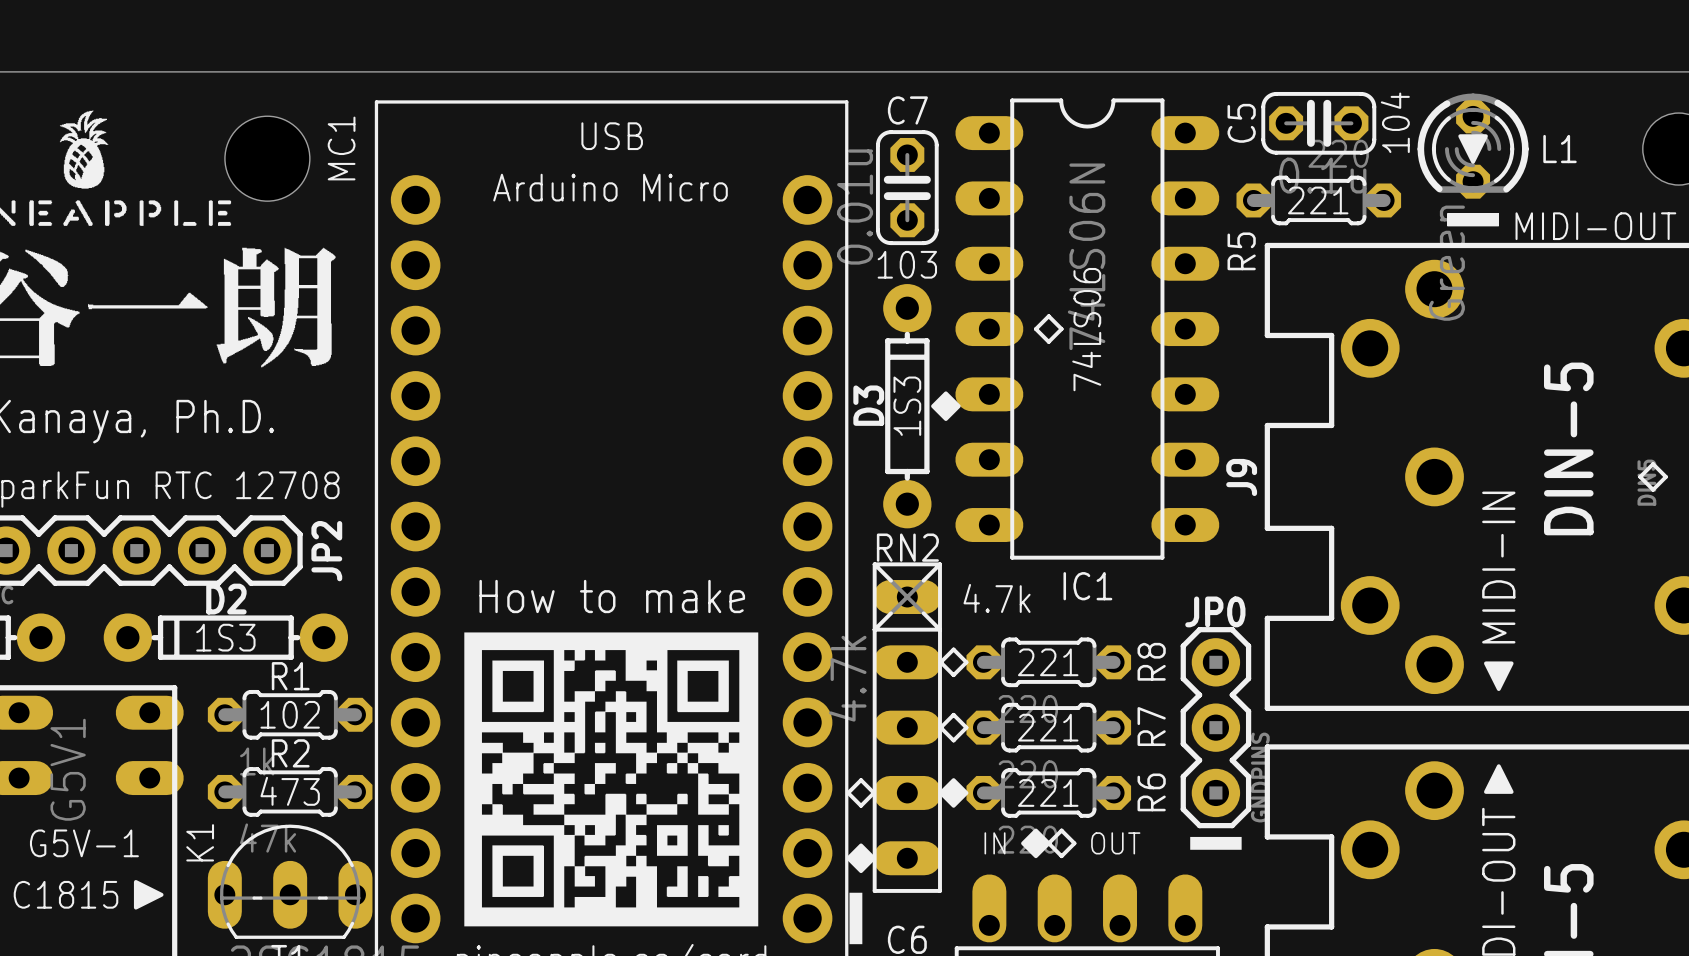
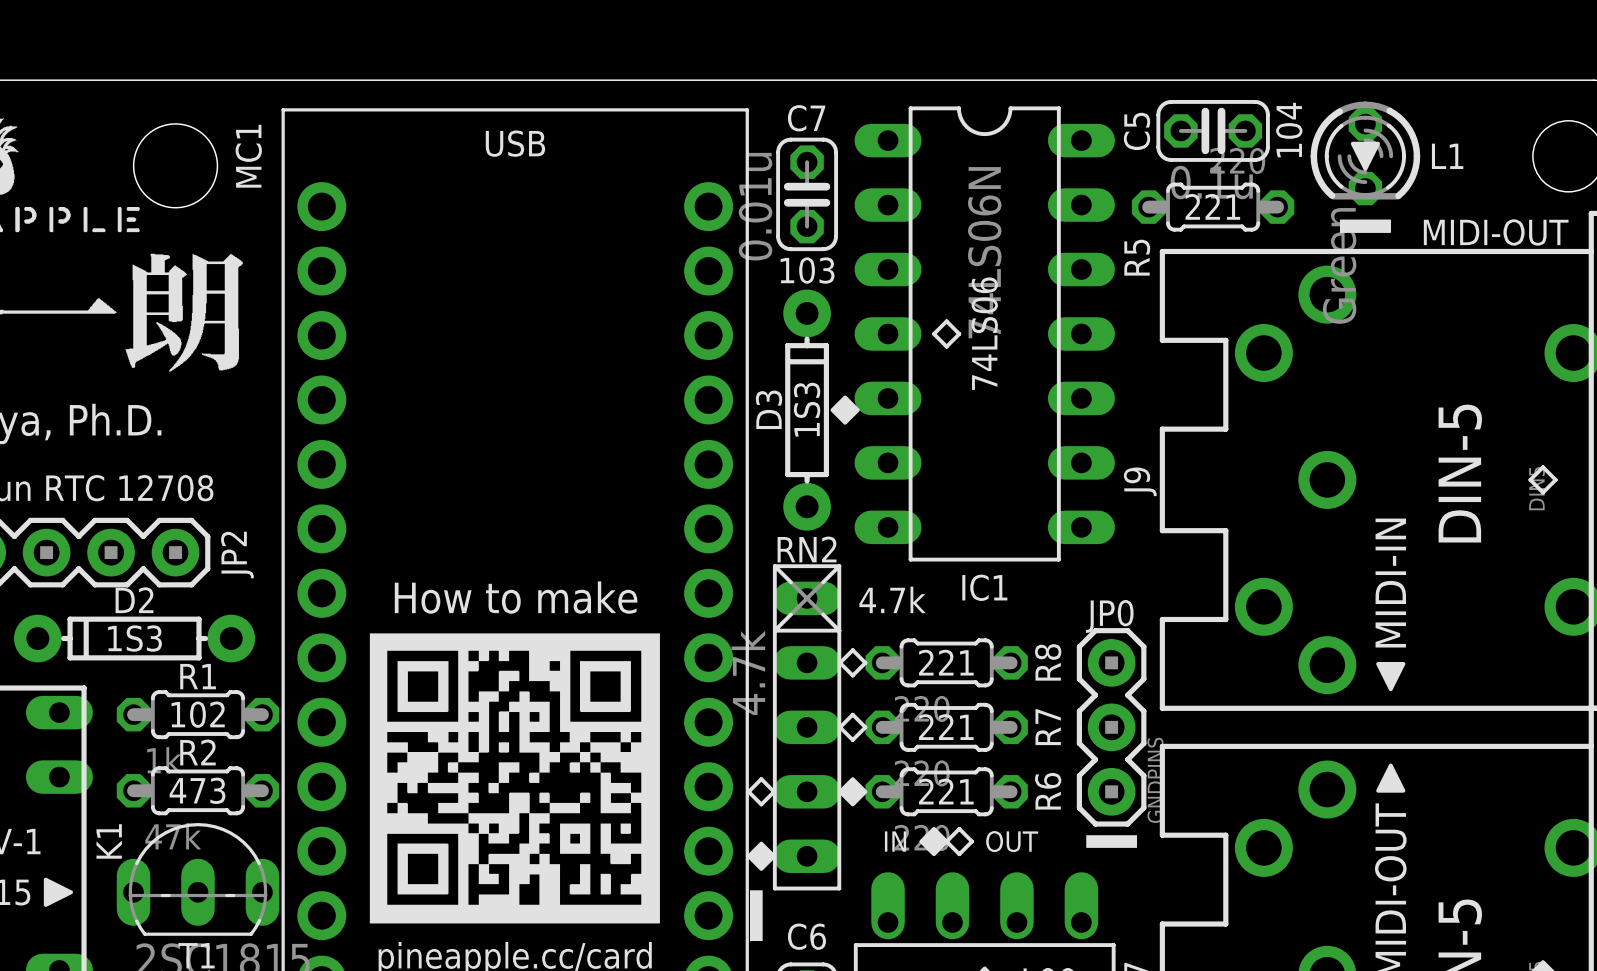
text: Arduino Micro (610, 187) -> none

